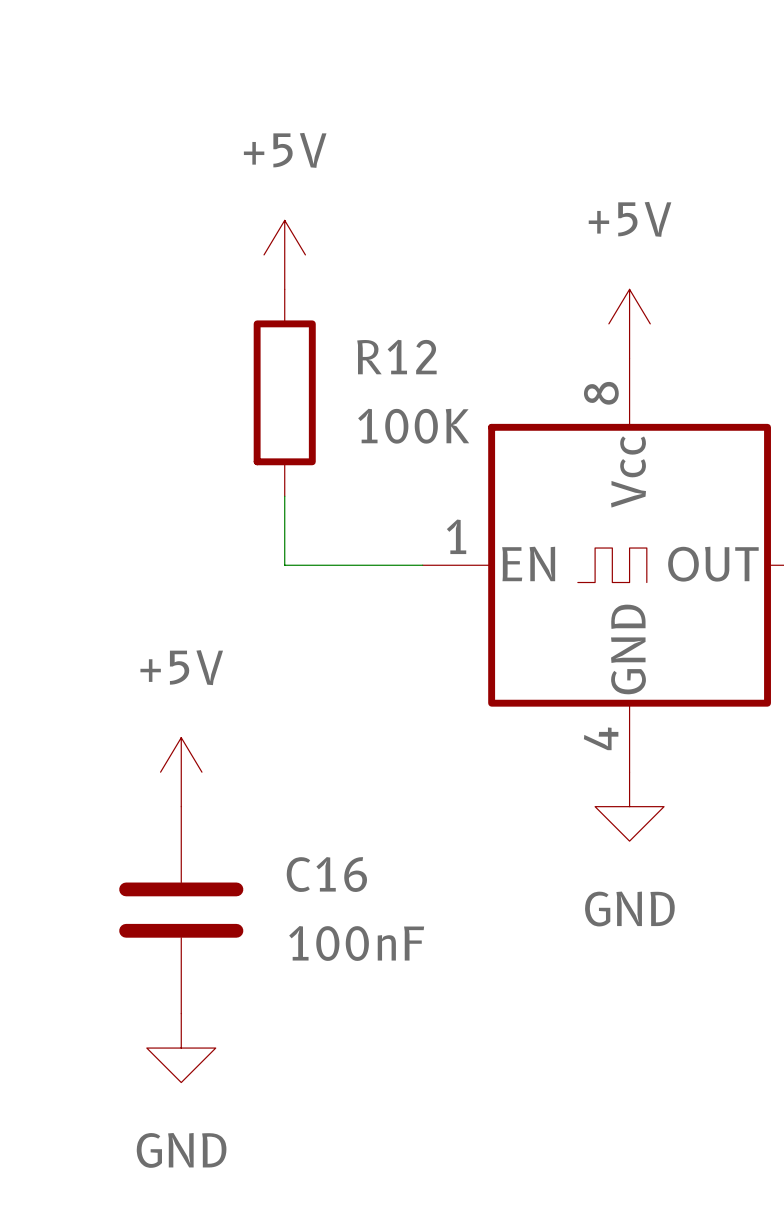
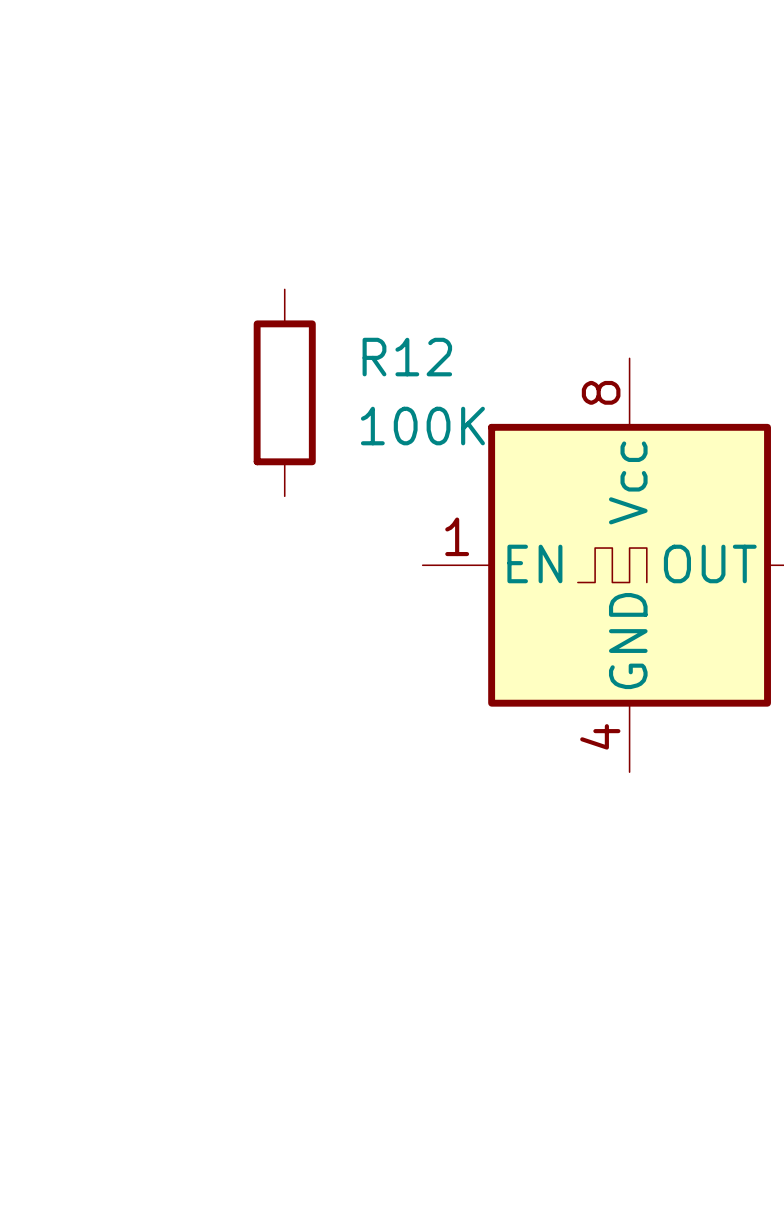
power symbol: +5V (284, 254) -> none
power symbol: +5V (629, 323) -> none
wire: (284, 496) (284, 565) (422, 565) -> none
power symbol: +5V (181, 772) -> none
power symbol: GND (629, 806) -> none
C16: 100nF (181, 910) -> none
power symbol: GND (181, 1048) -> none

